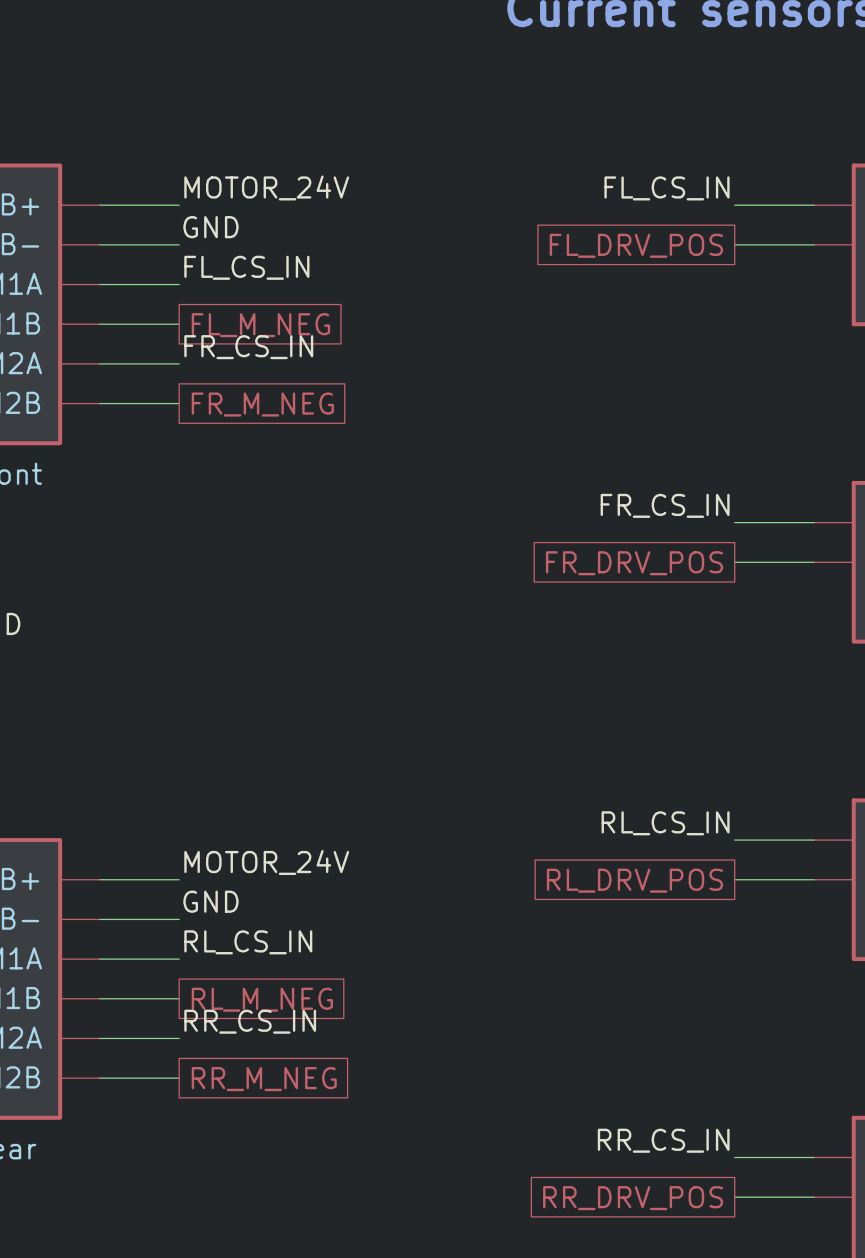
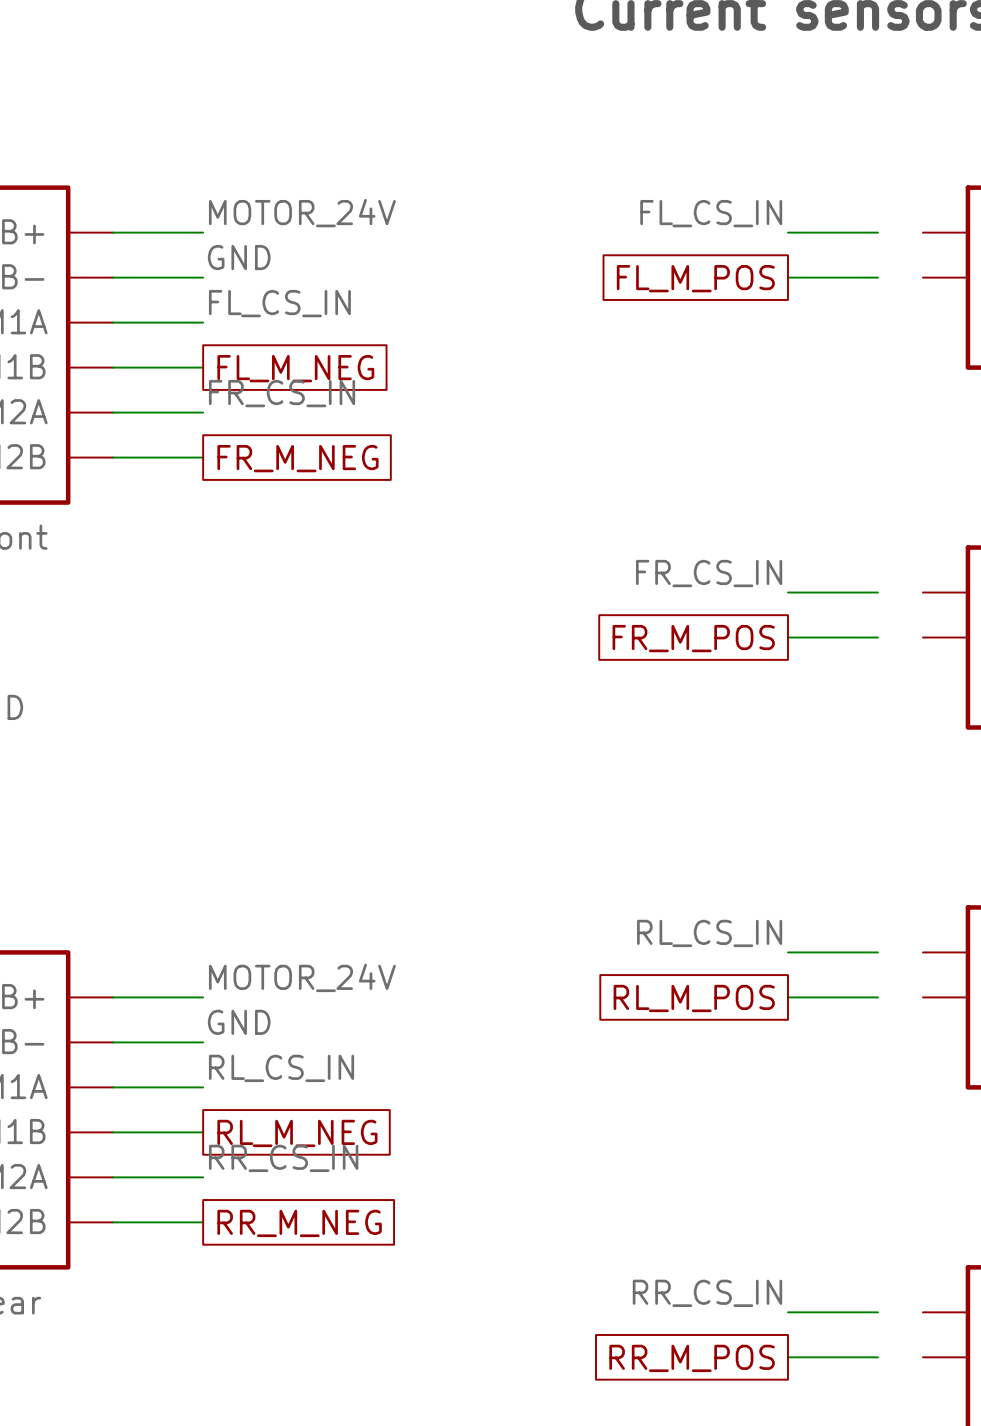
label position: FL_CS_IN (666, 188) -> FL_CS_IN (711, 213)
wire: (774, 205) (814, 205) -> (787, 232) (832, 232)
wire: (774, 244) (814, 244) -> (787, 277) (832, 277)
global label: FL_DRV_POS (636, 245) -> FL_M_POS (695, 278)
label position: FR_CS_IN (665, 505) -> FR_CS_IN (709, 573)
wire: (774, 522) (814, 522) -> (787, 592) (832, 592)
wire: (774, 562) (814, 562) -> (787, 637) (832, 637)
global label: FR_DRV_POS (634, 563) -> FR_M_POS (693, 638)
label position: RL_CS_IN (665, 823) -> RL_CS_IN (709, 933)
wire: (774, 840) (814, 840) -> (787, 952) (832, 952)
wire: (774, 879) (814, 879) -> (787, 997) (832, 997)
global label: RL_DRV_POS (634, 880) -> RL_M_POS (694, 998)
label position: RR_CS_IN (663, 1140) -> RR_CS_IN (707, 1293)
wire: (774, 1157) (814, 1157) -> (787, 1312) (832, 1312)
wire: (774, 1197) (814, 1197) -> (787, 1357) (832, 1357)
global label: RR_DRV_POS (633, 1198) -> RR_M_POS (692, 1358)

